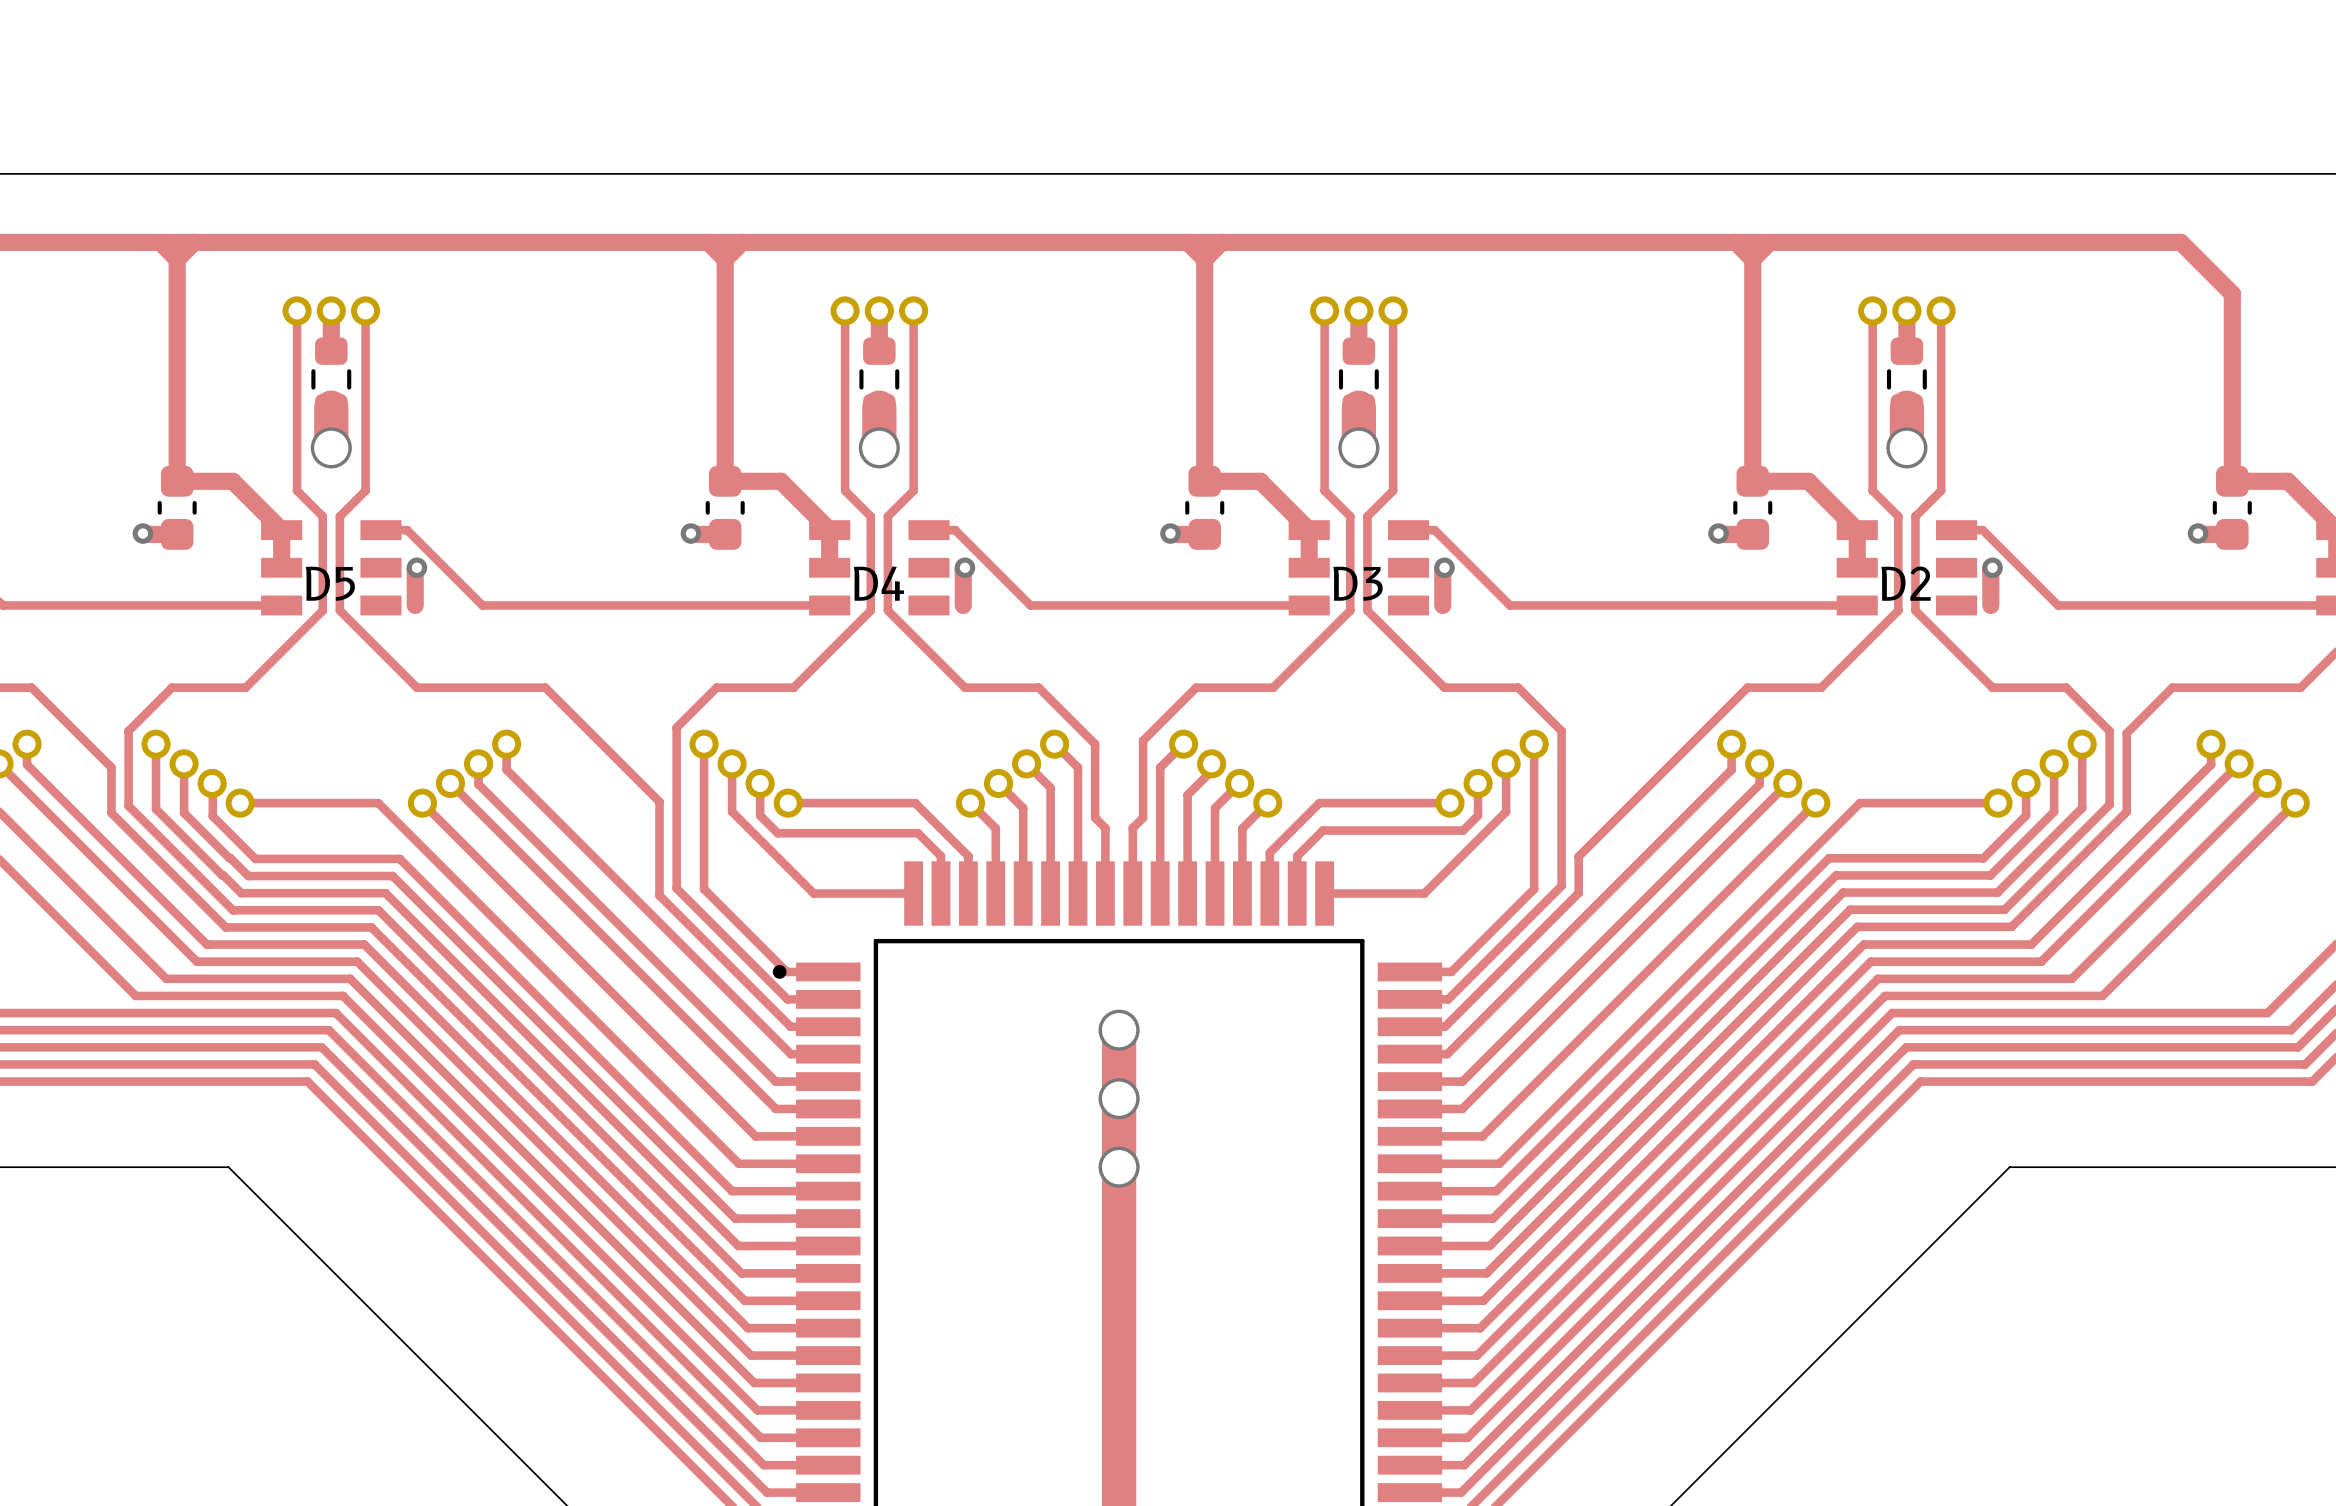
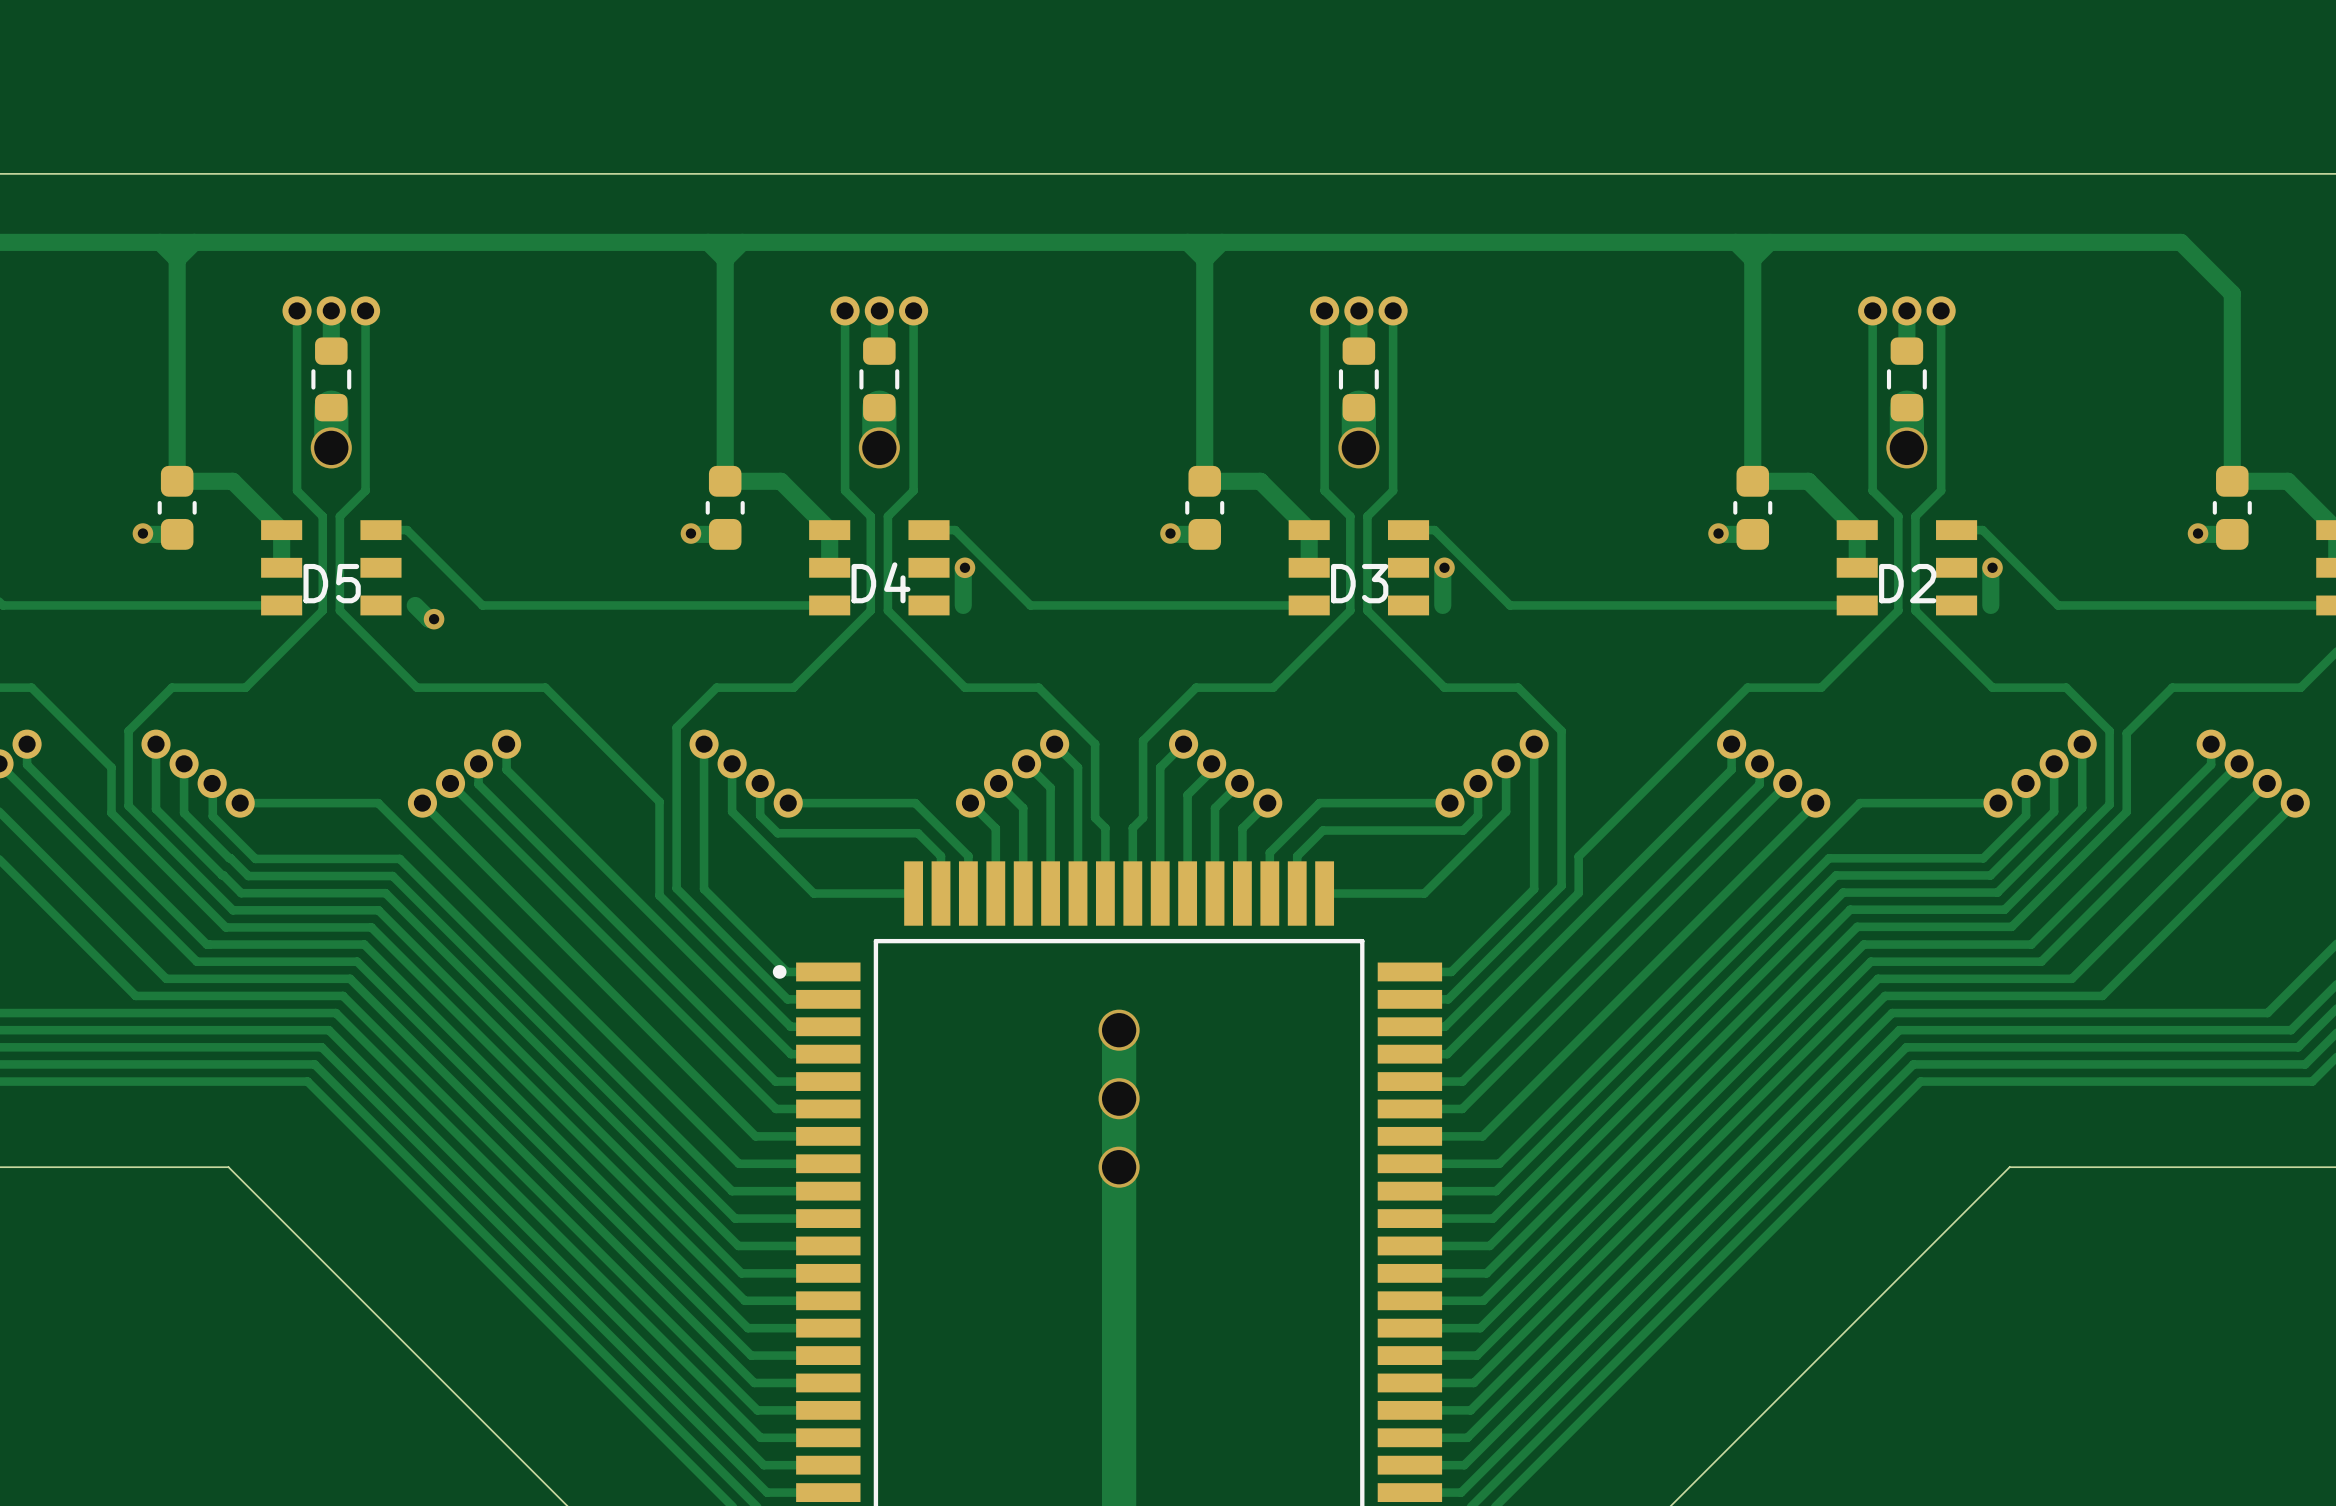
track: (416, 567) (415, 569) (415, 605) -> (434, 619) (428, 619) (415, 605)
via position: (416, 567) -> (434, 619)

